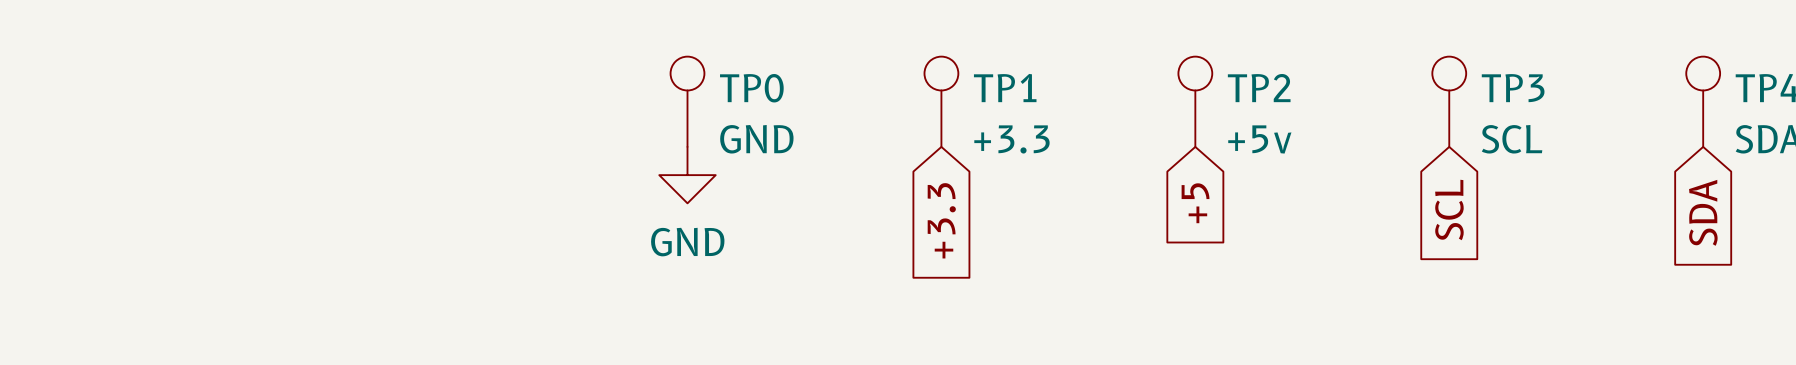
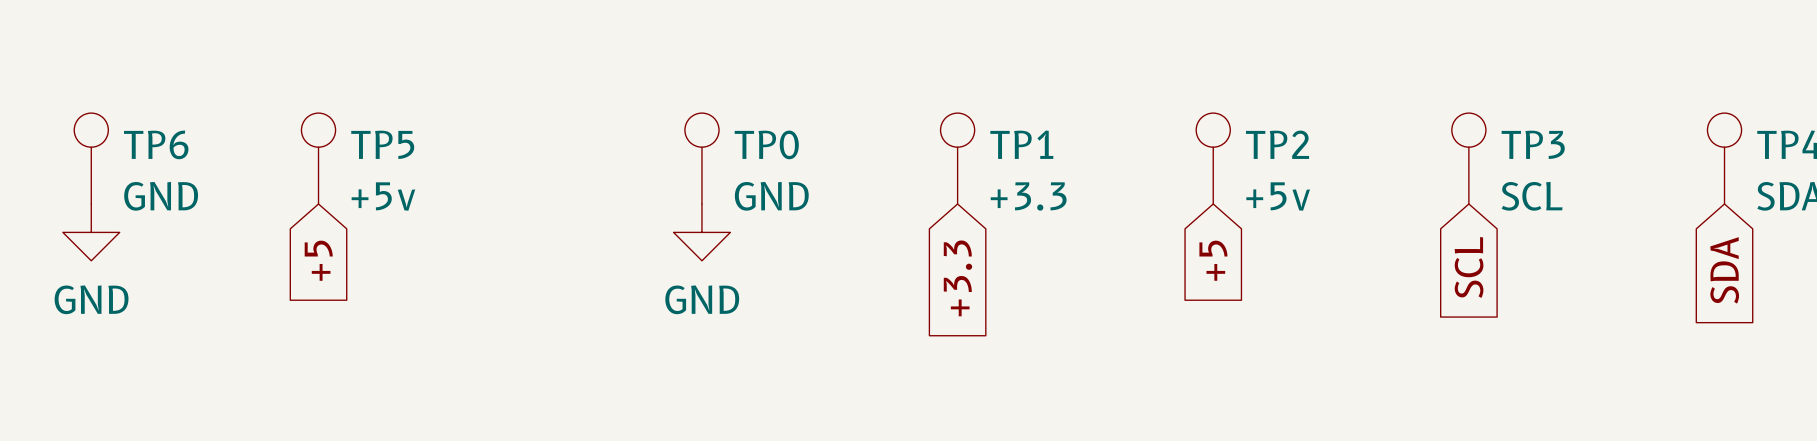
TP6: none -> GND (91, 158)
TP5: none -> +5v (318, 158)
power symbol: none -> GND (91, 232)
global label: none -> +5 (318, 260)

